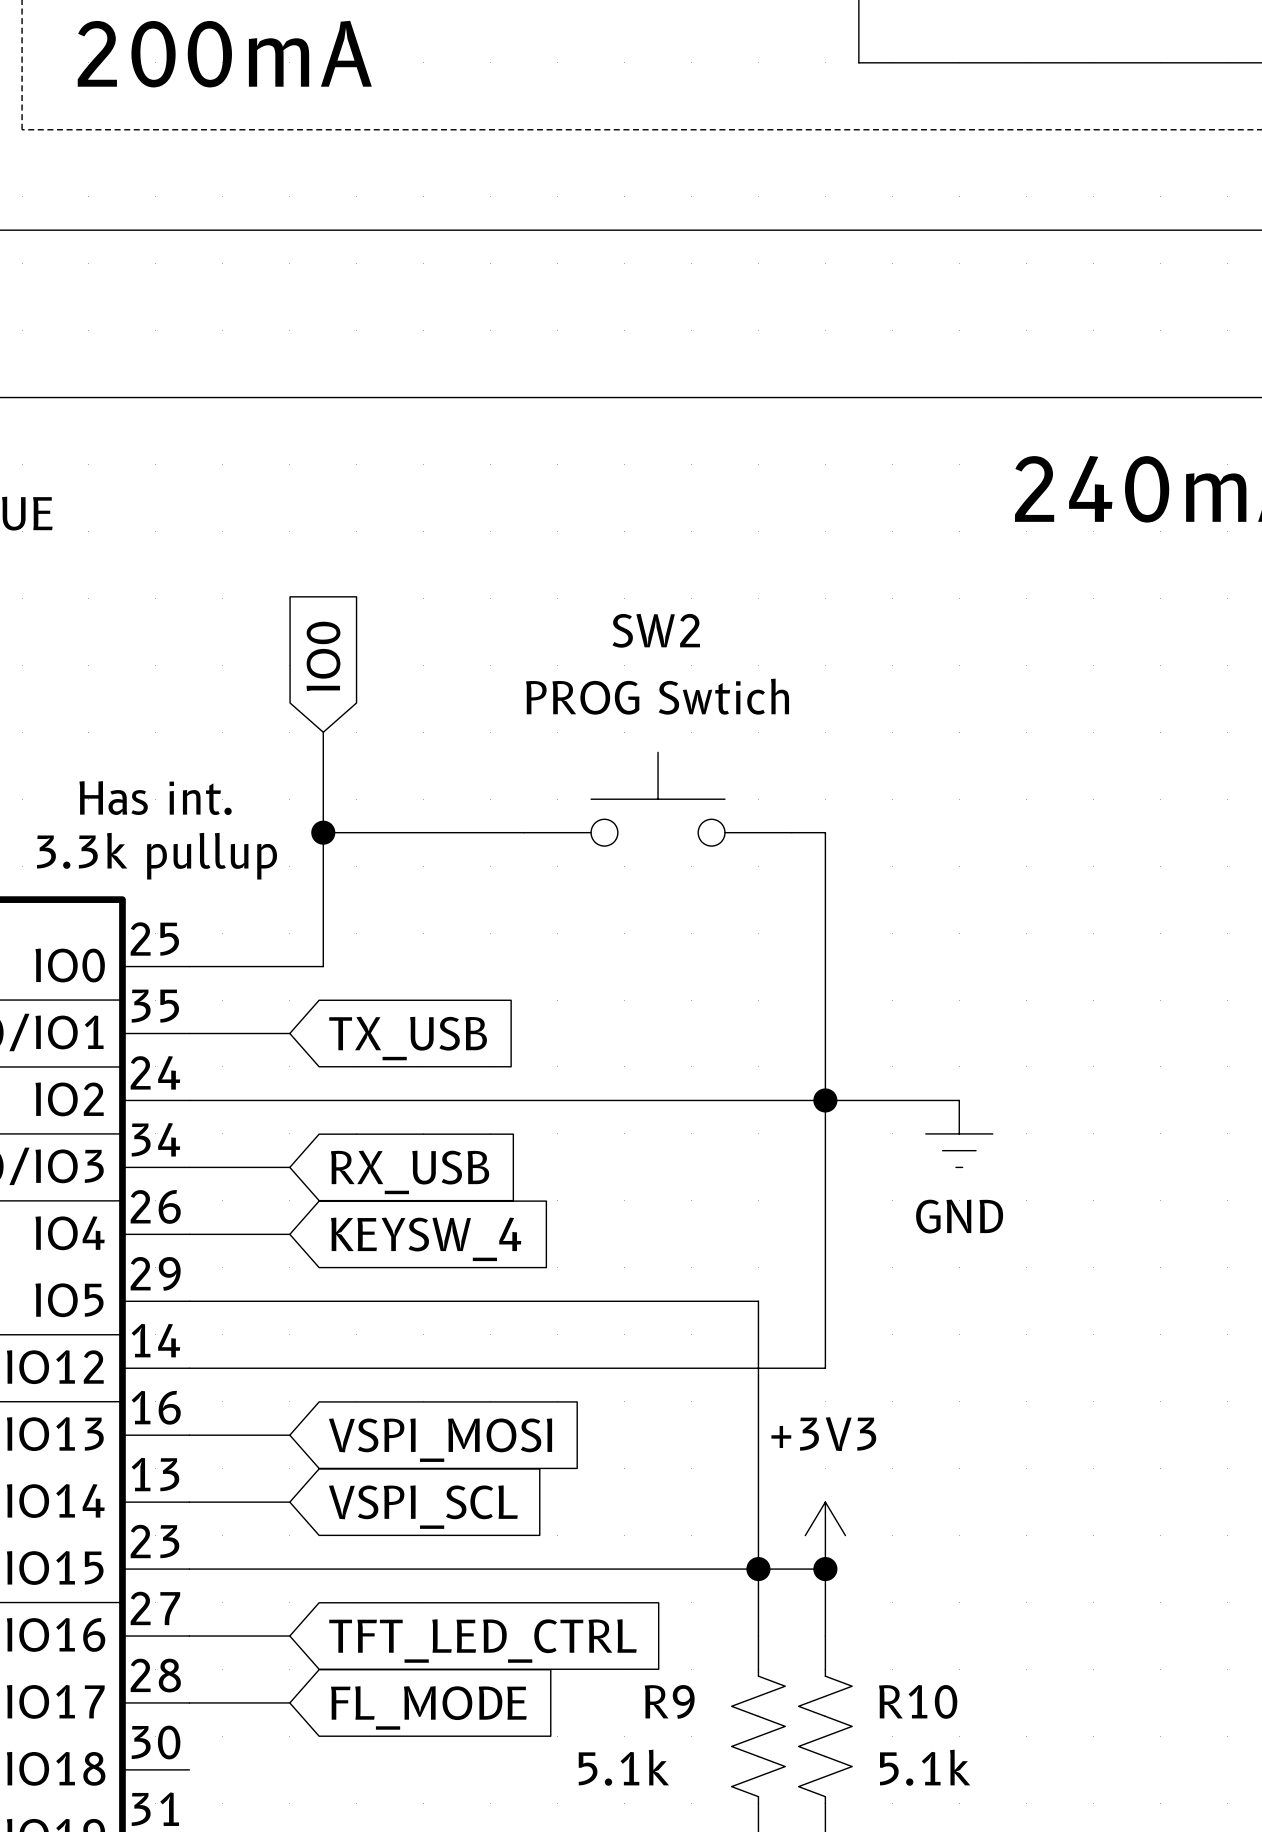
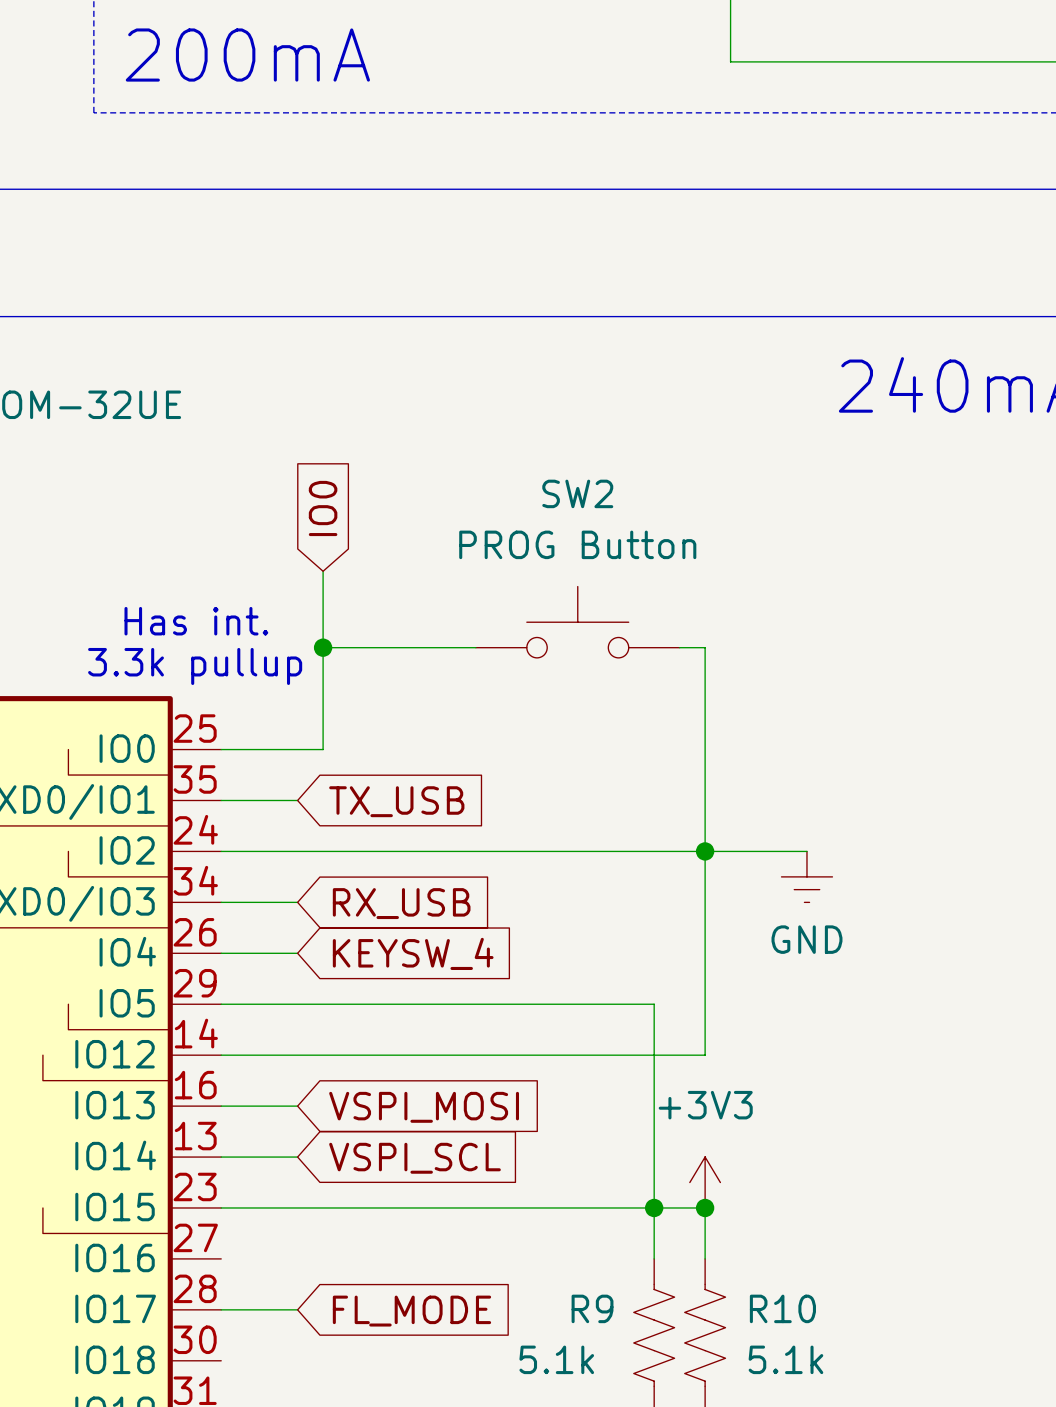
SW2 value: PROG Swtich (657, 696) -> PROG Button (577, 544)
wire: (189, 1636) (289, 1636) -> none
global label: TFT_LED_CTRL (482, 1641) -> none

